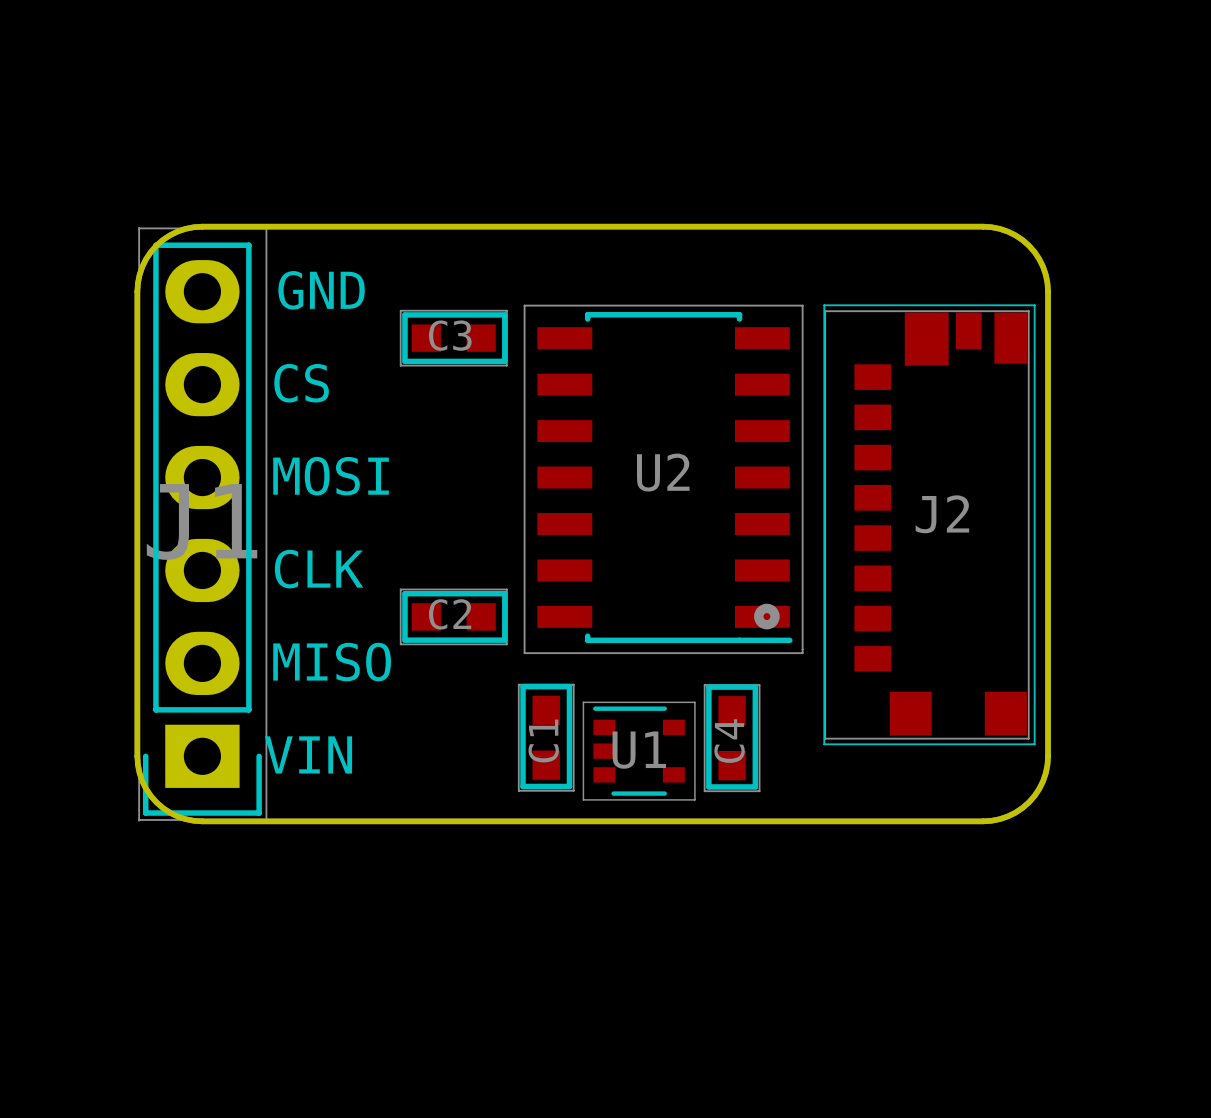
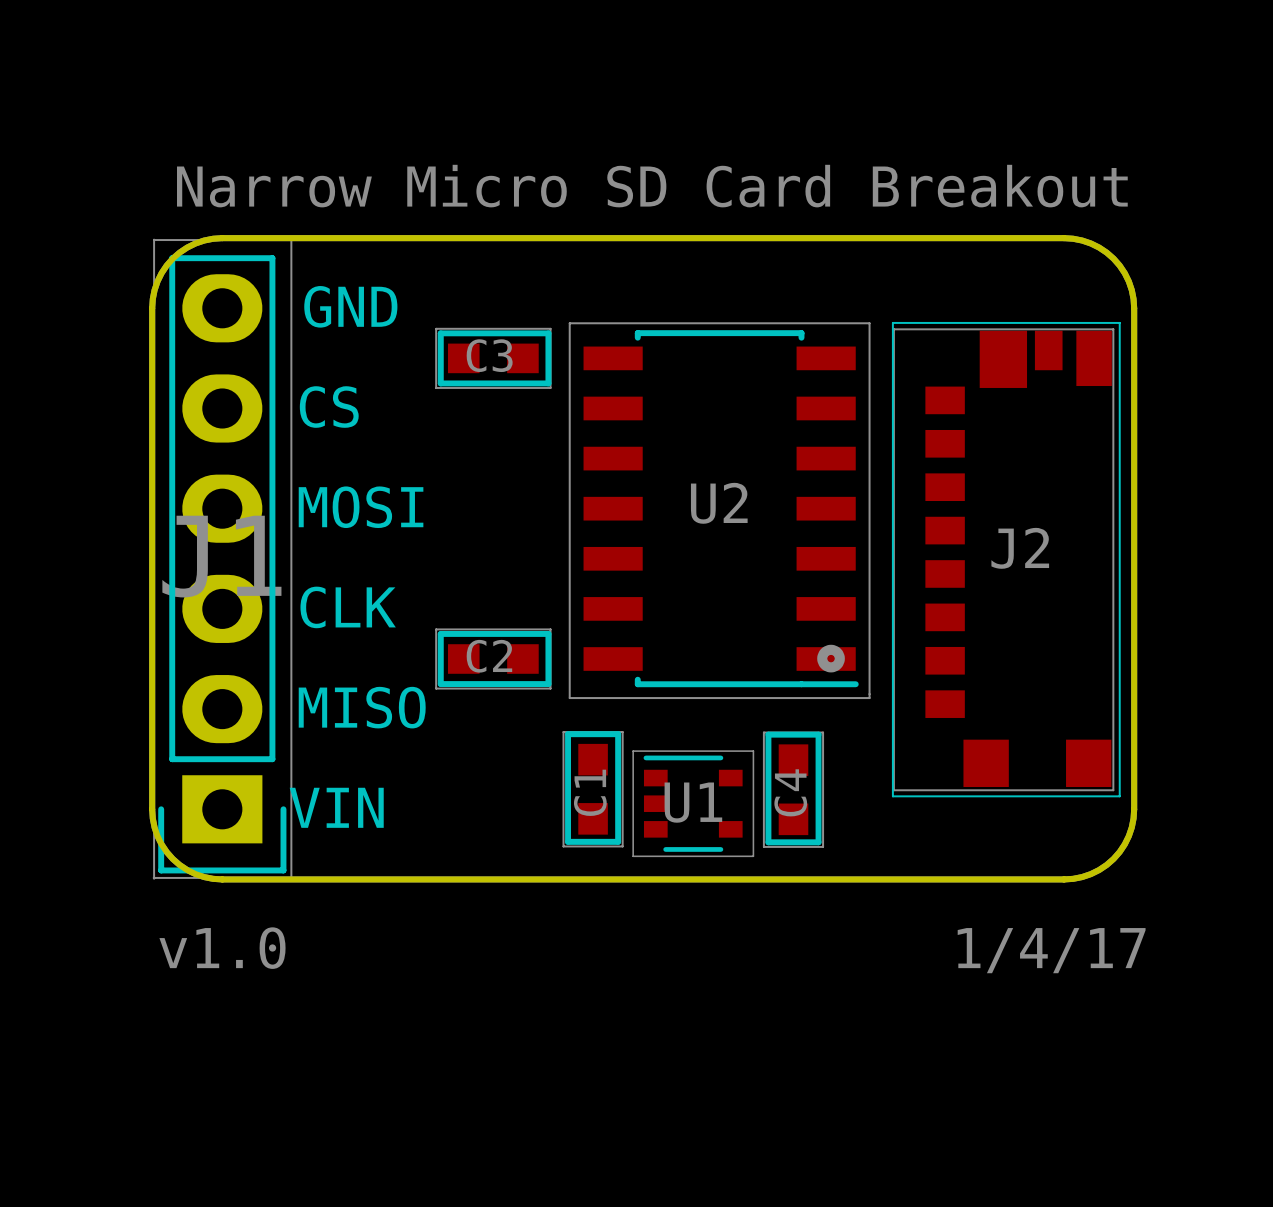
text: none -> Narrow Micro SD Card Breakout (652, 186)
text: none -> v1.0 1/4/17 (652, 950)

